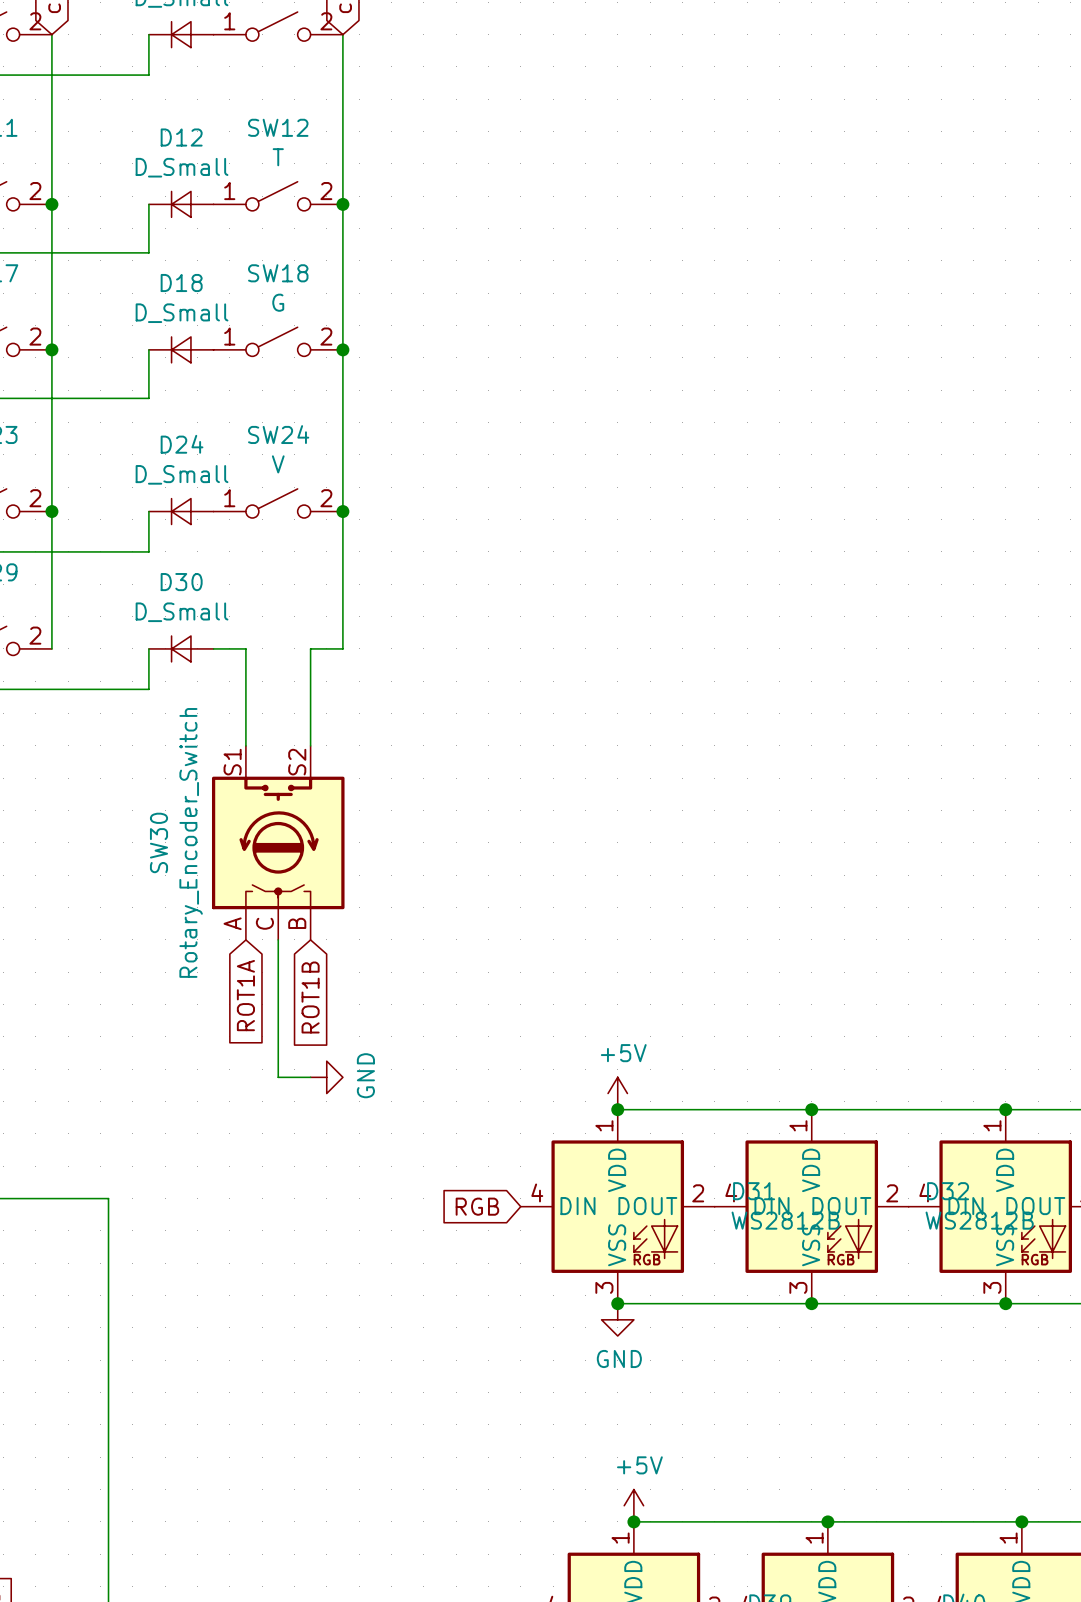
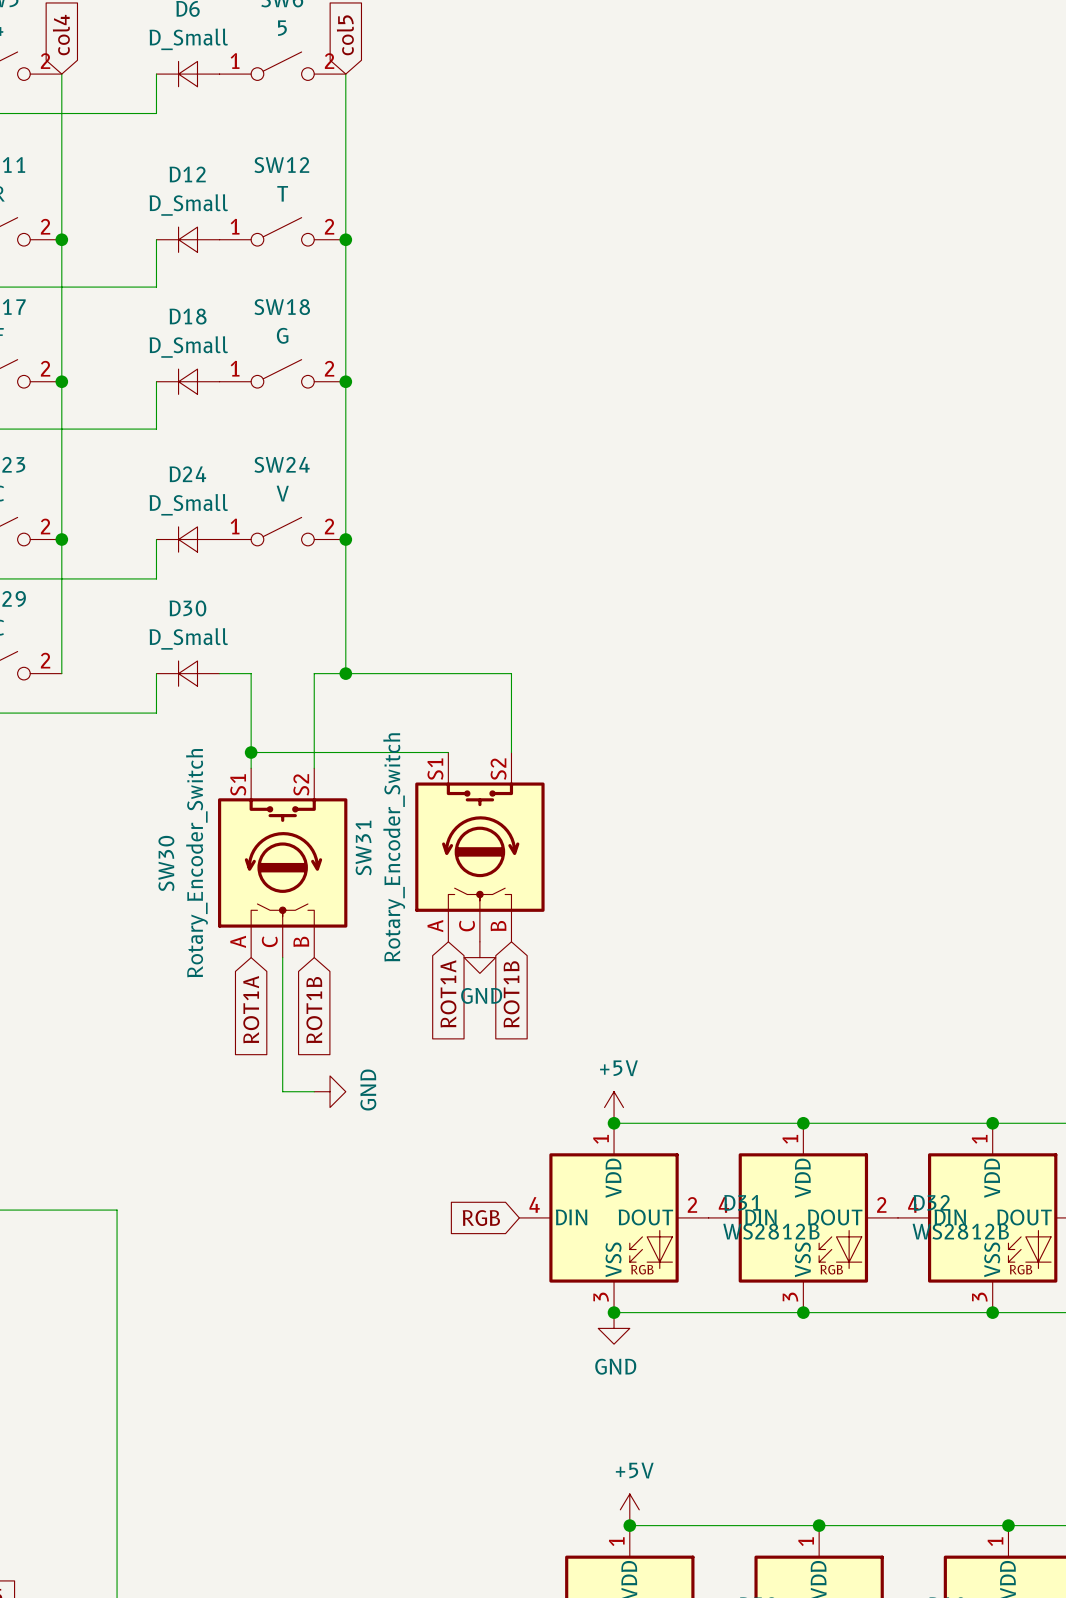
wire: none -> (345, 673) (511, 673) (511, 752)
junction: none -> (345, 673)
wire: none -> (251, 752) (448, 752)
junction: none -> (251, 752)
SW31: none -> Rotary_Encoder_Switch (479, 847)
power symbol: none -> GND (479, 957)
global label: none -> ROT1A (448, 993)
global label: none -> ROT1B (511, 994)

